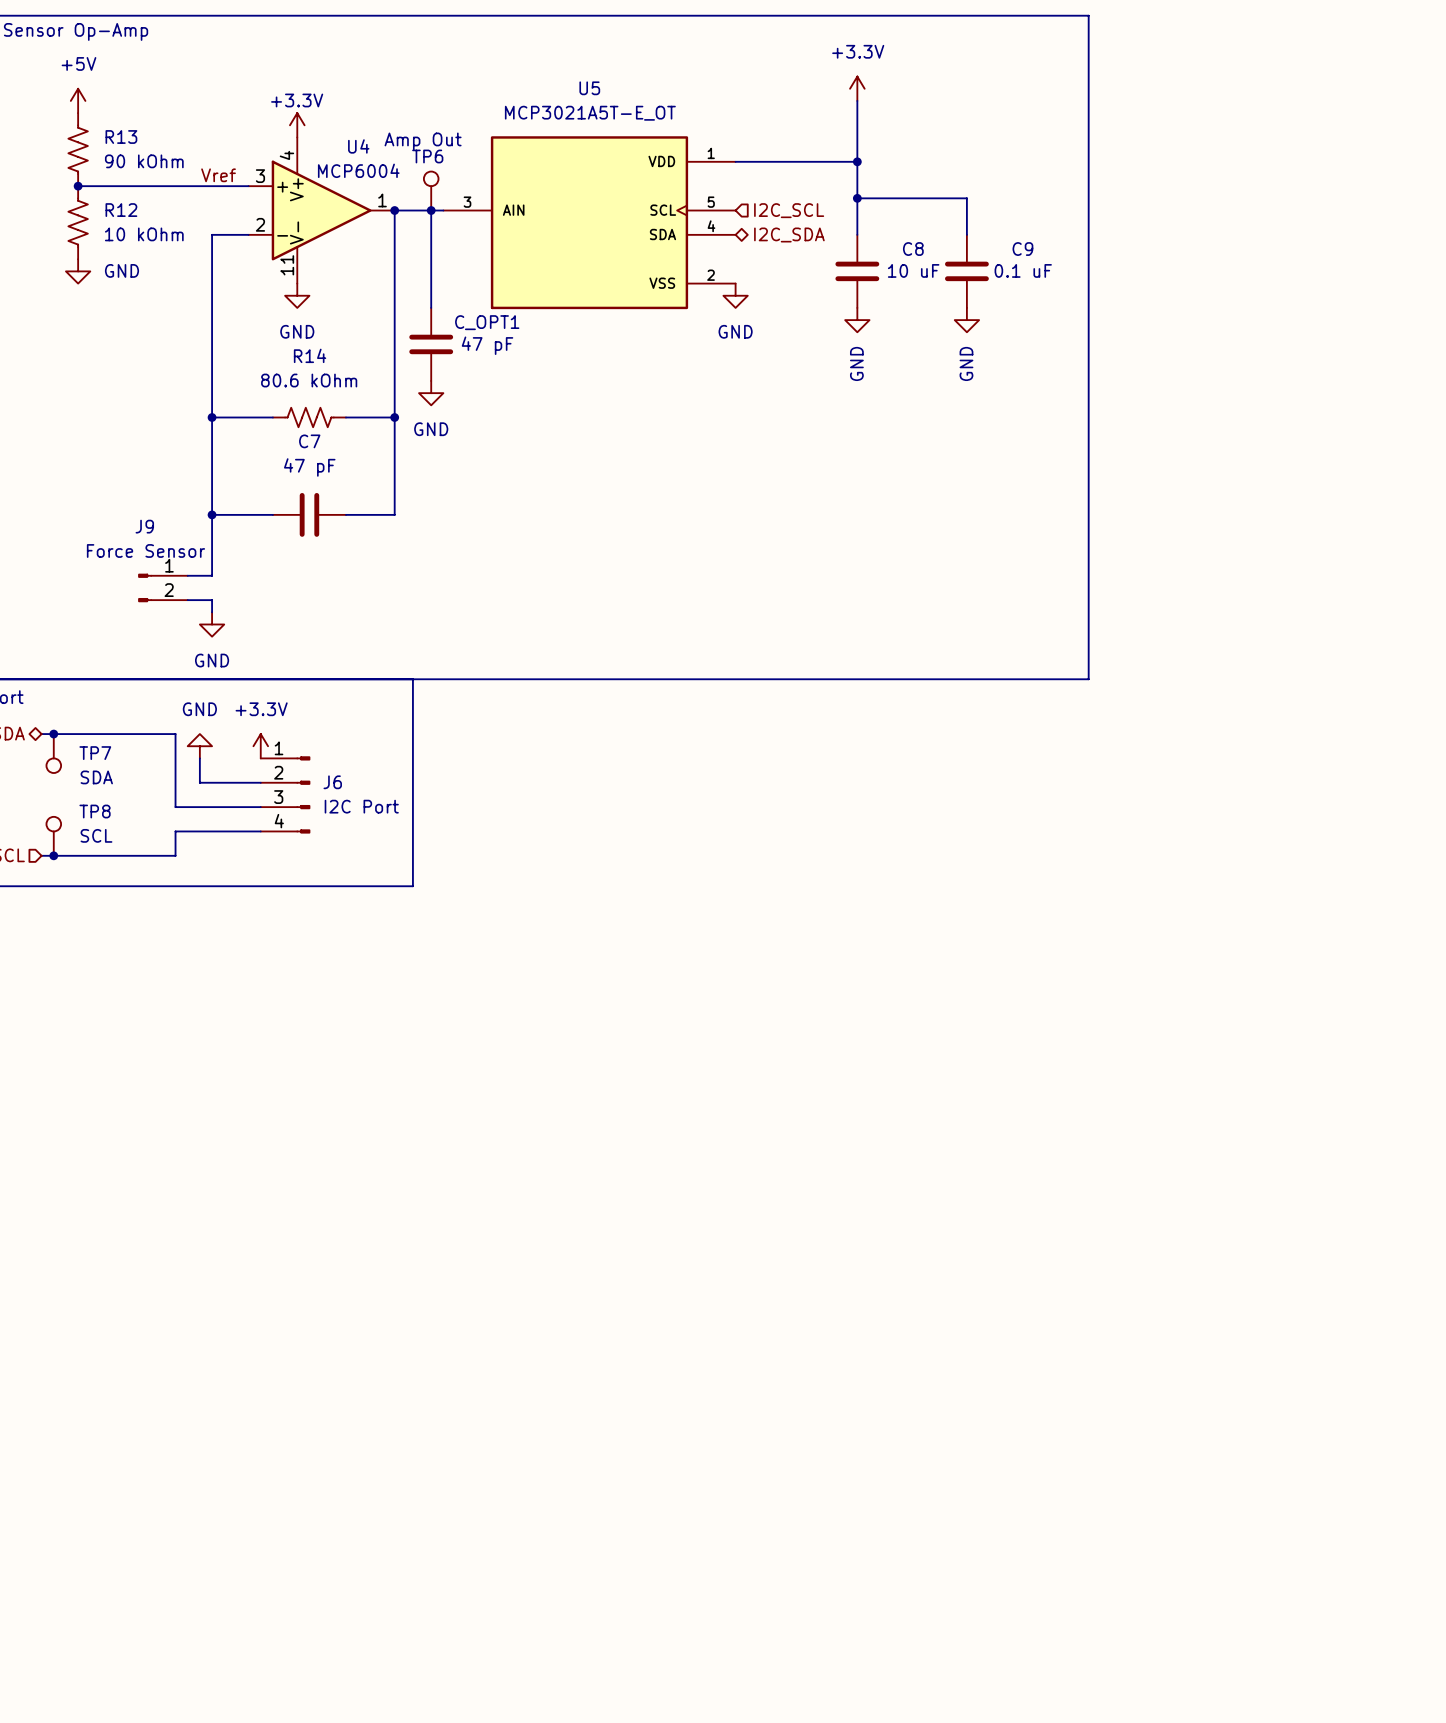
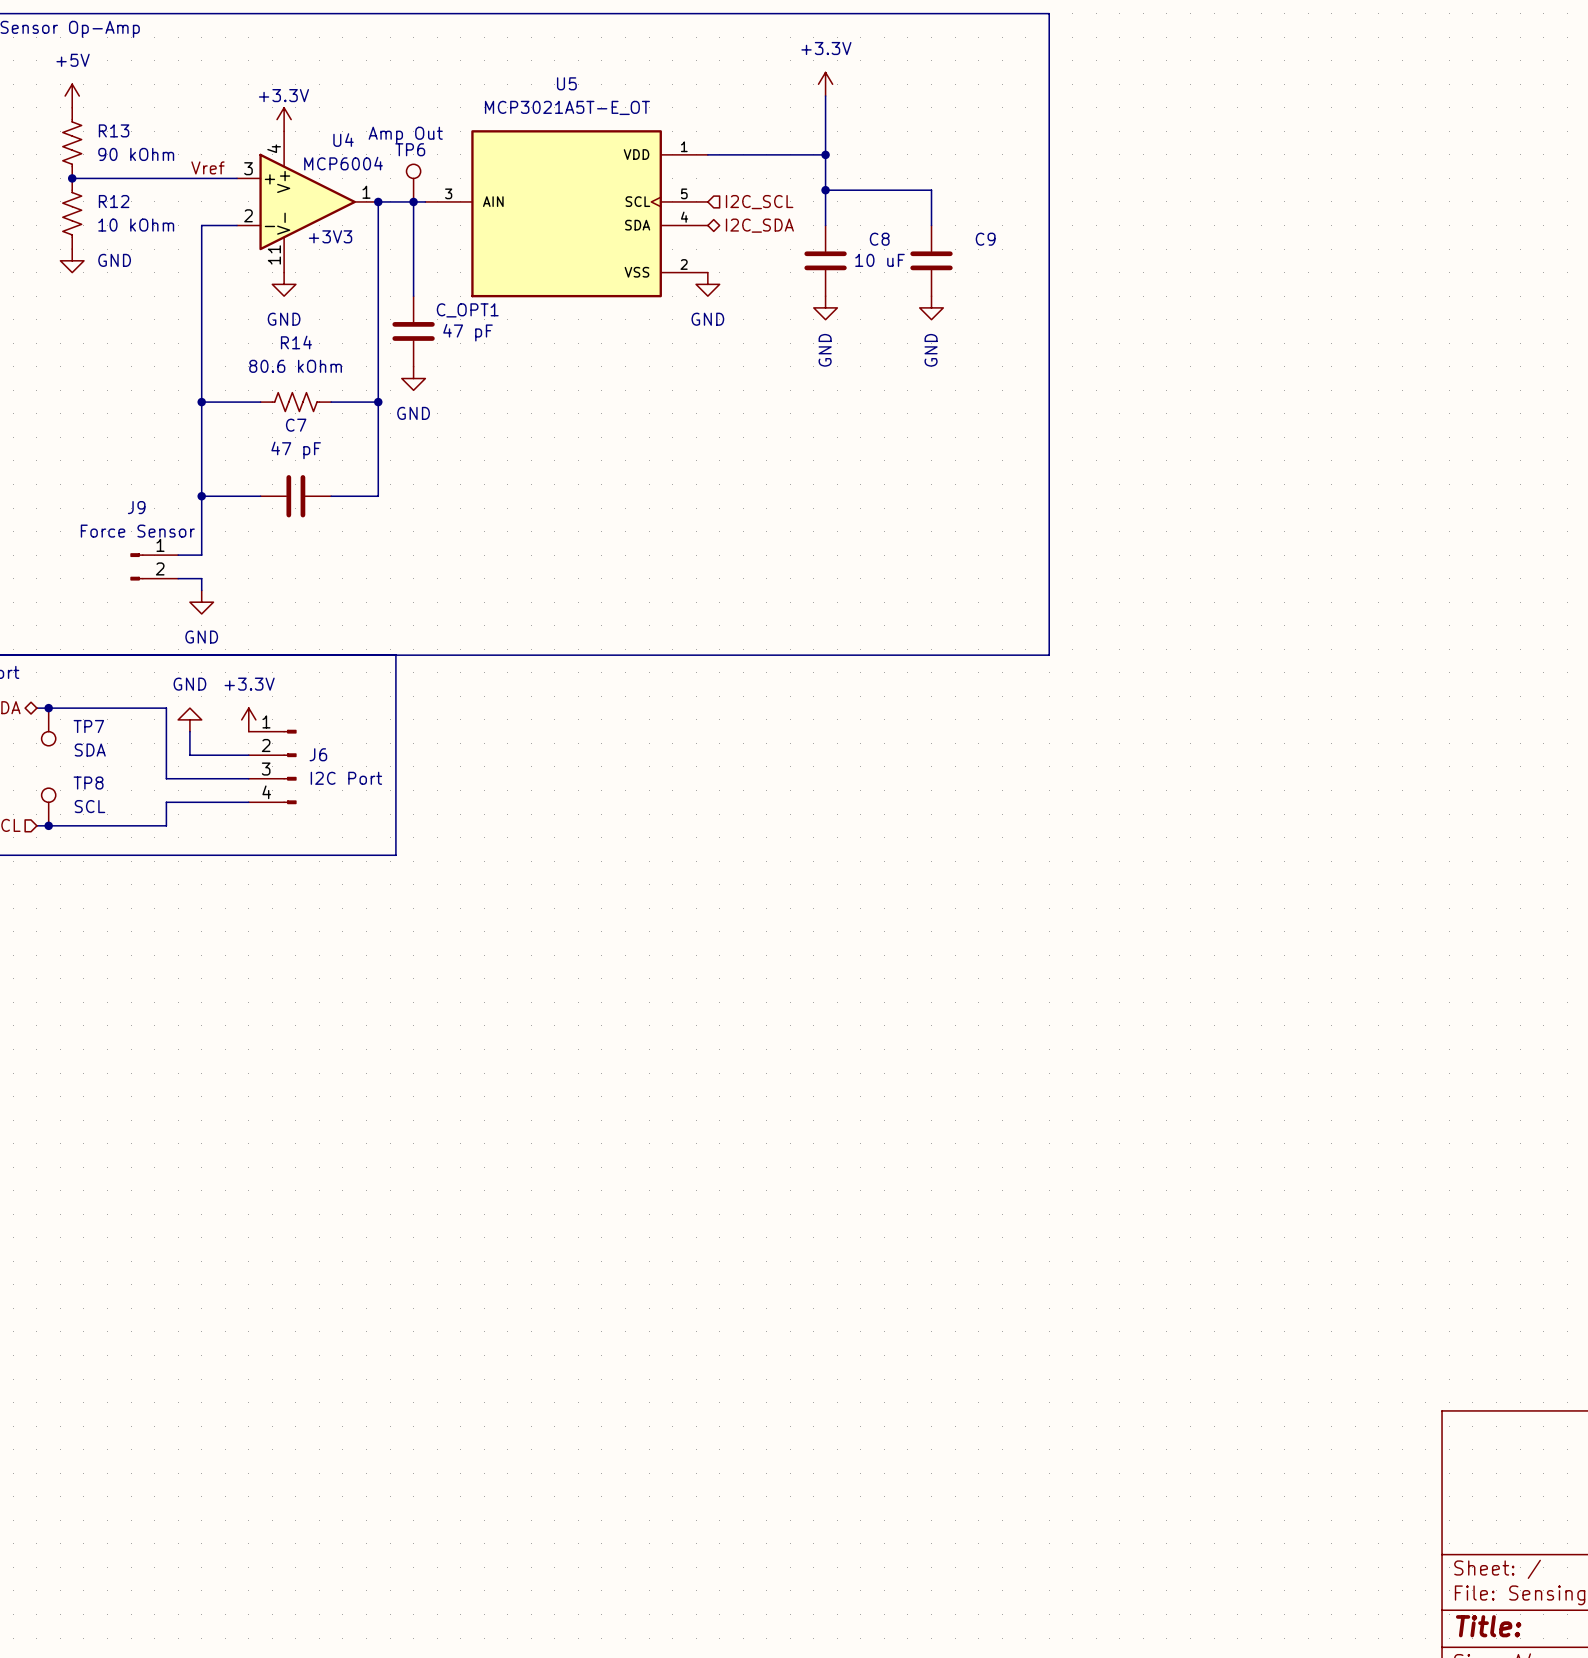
C9 value: 0.1 uF (1023, 270) -> +3V3 (330, 236)

